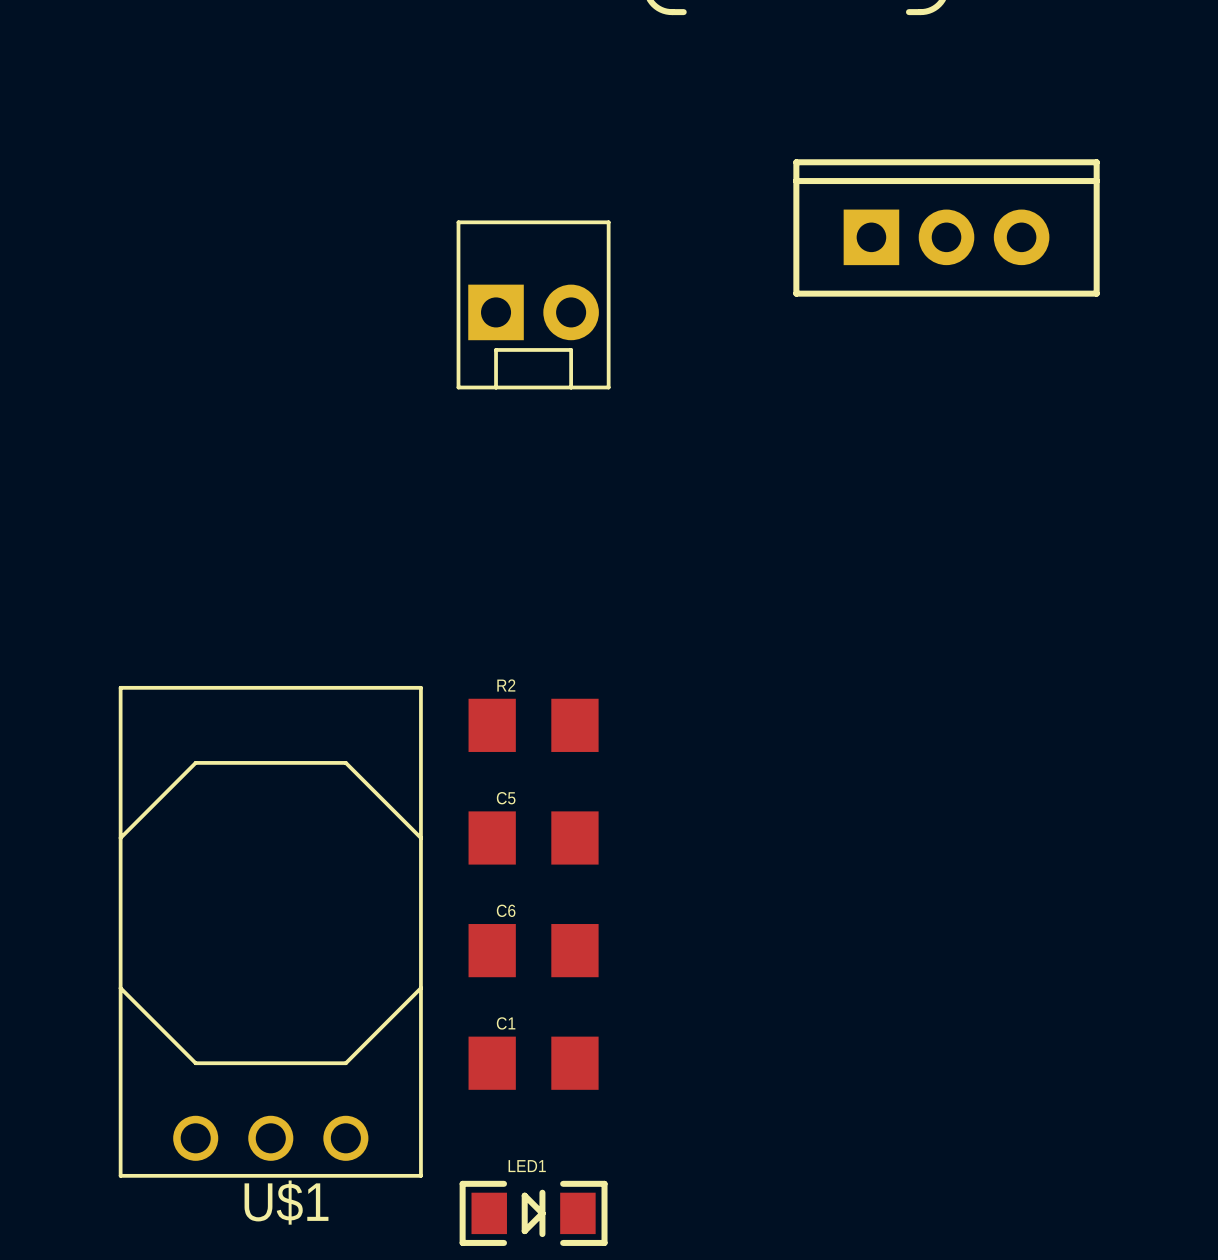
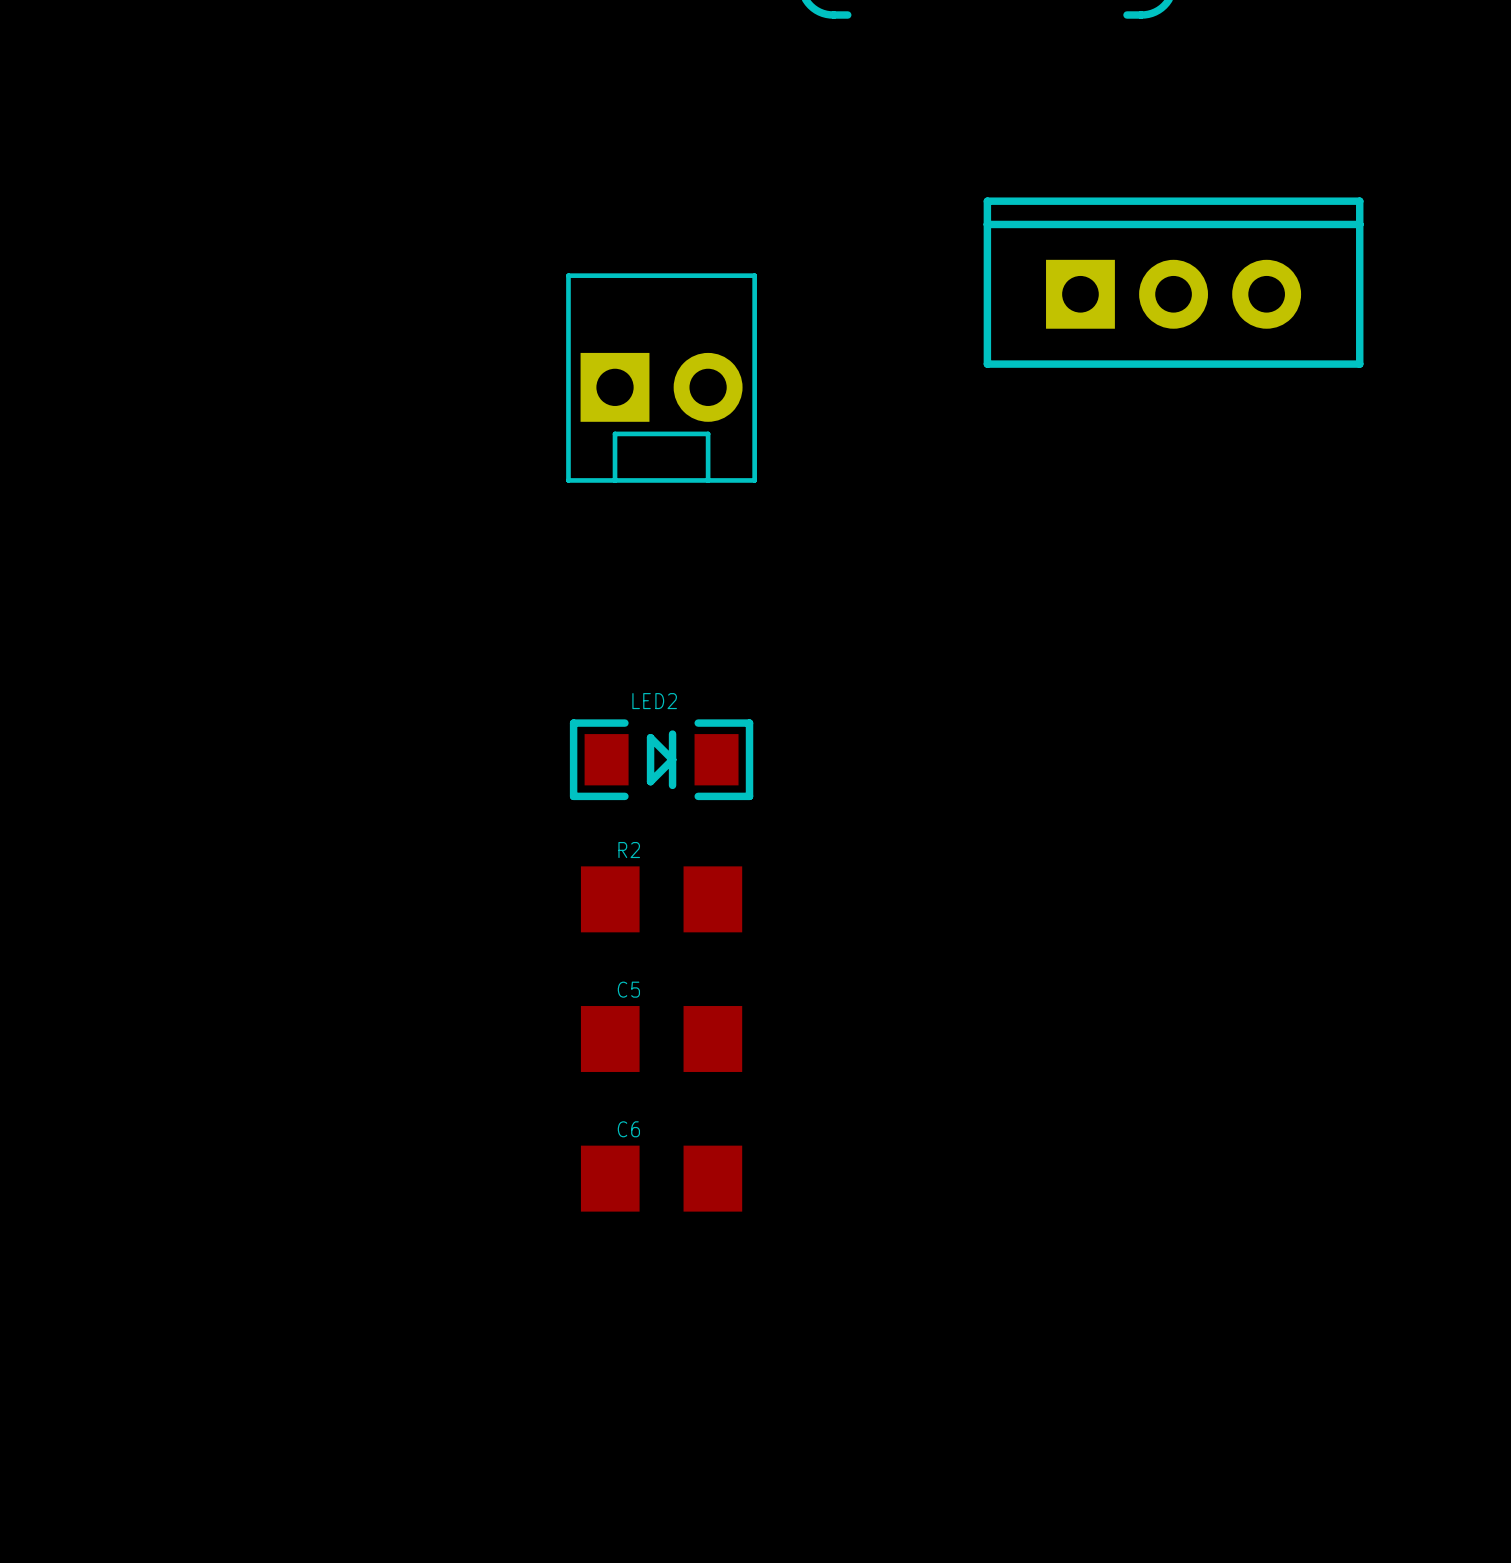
LED2: none -> (661, 759)
U$1: (270, 931) -> none
C1: (533, 1063) -> none
LED1: (533, 1213) -> none

